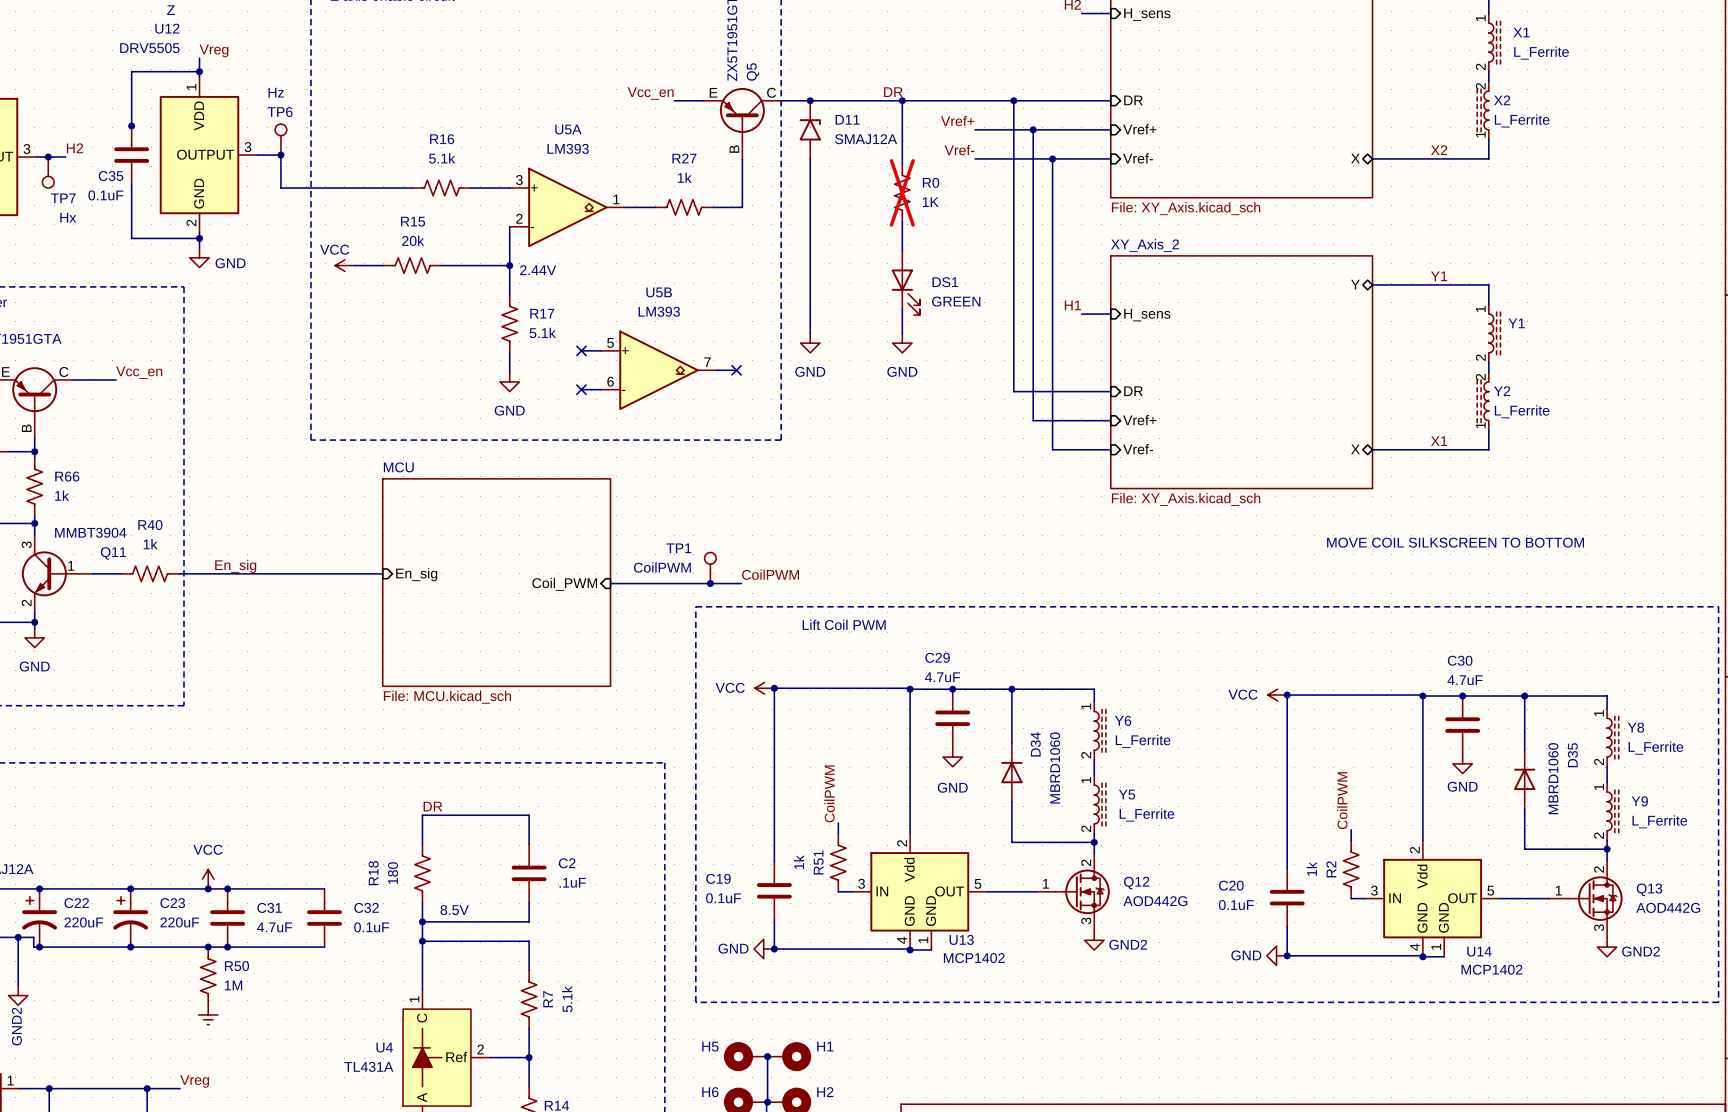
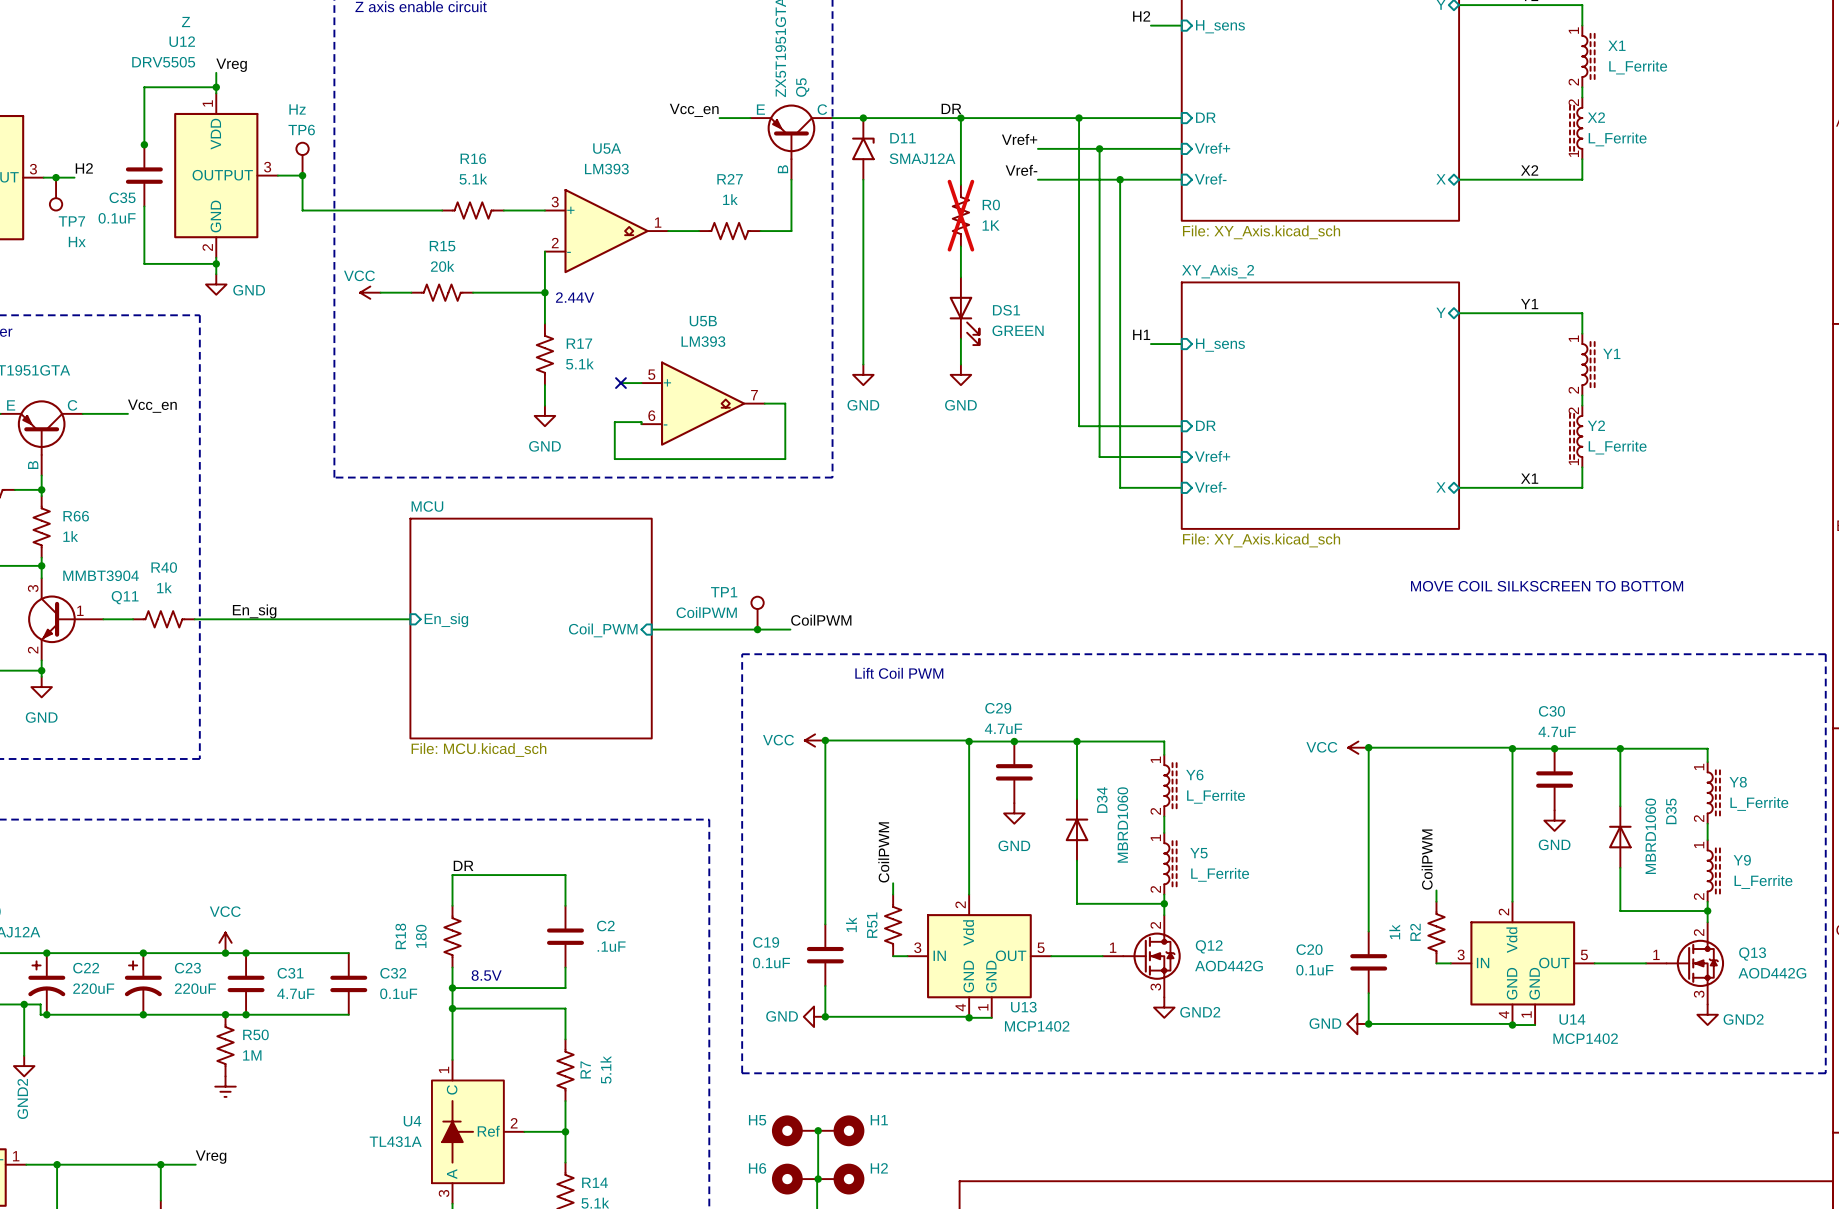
no-connect mark: (736, 370) -> none
wire: (581, 389) (600, 389) -> (785, 403) (785, 459) (614, 459) (614, 422) (641, 422) (641, 424)
no-connect mark: (581, 389) -> none

